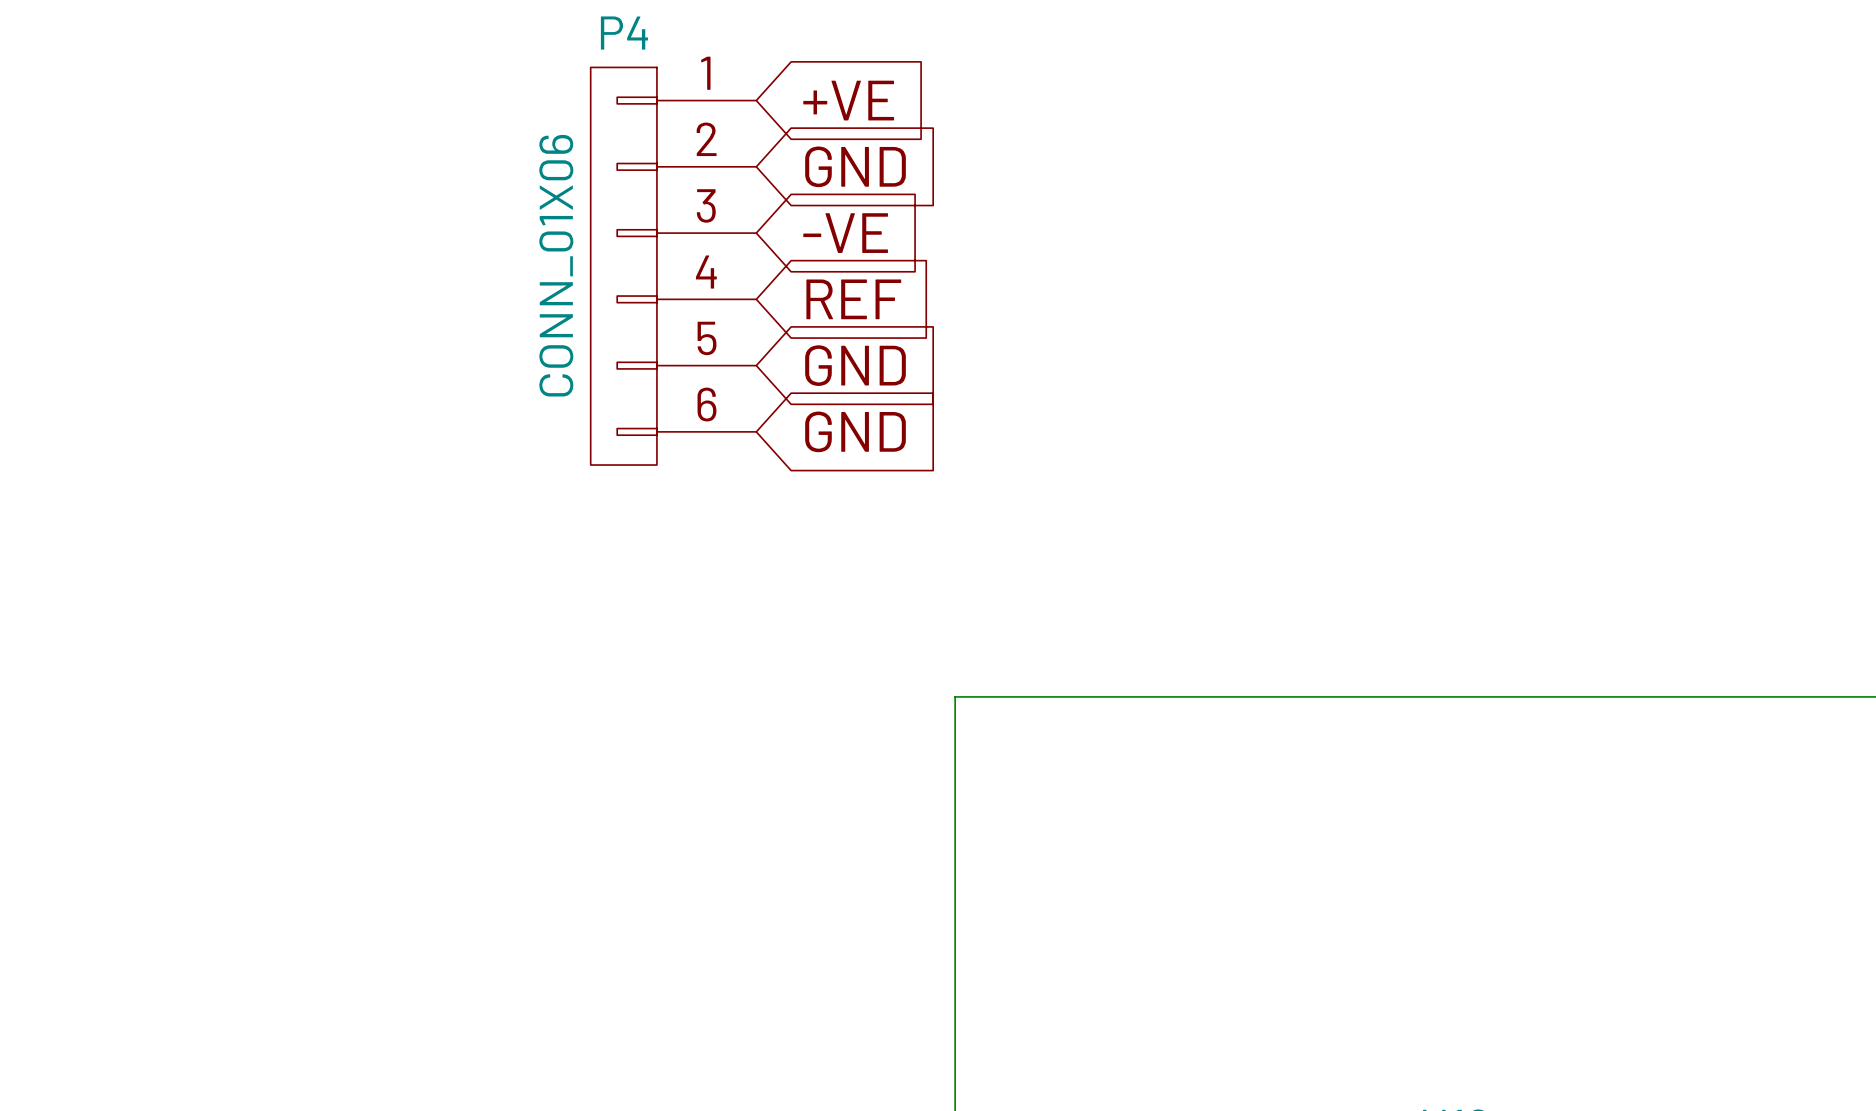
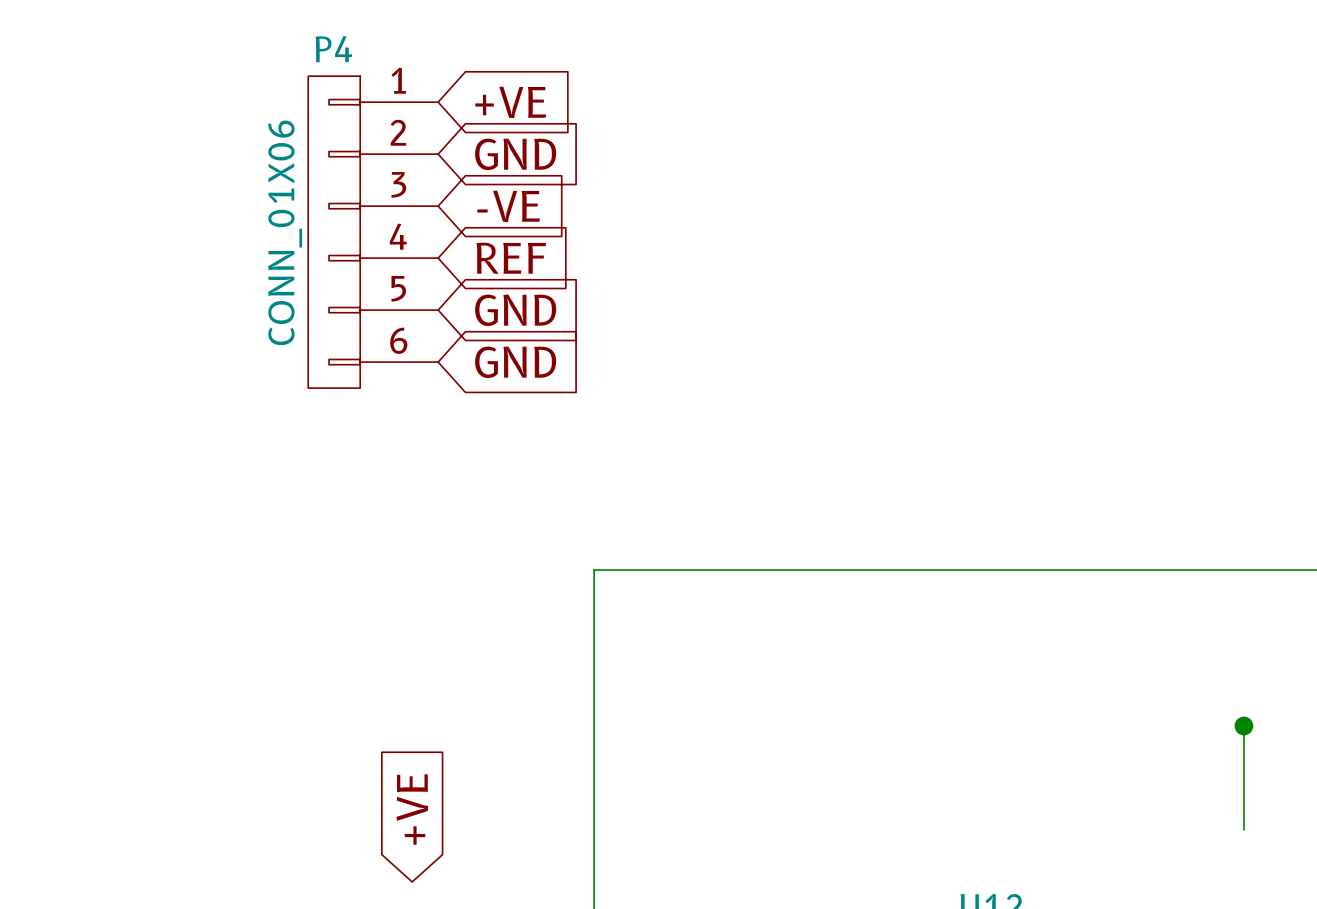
wire: none -> (1243, 725) (1243, 829)
junction: none -> (1243, 725)
global label: none -> +VE (412, 809)

